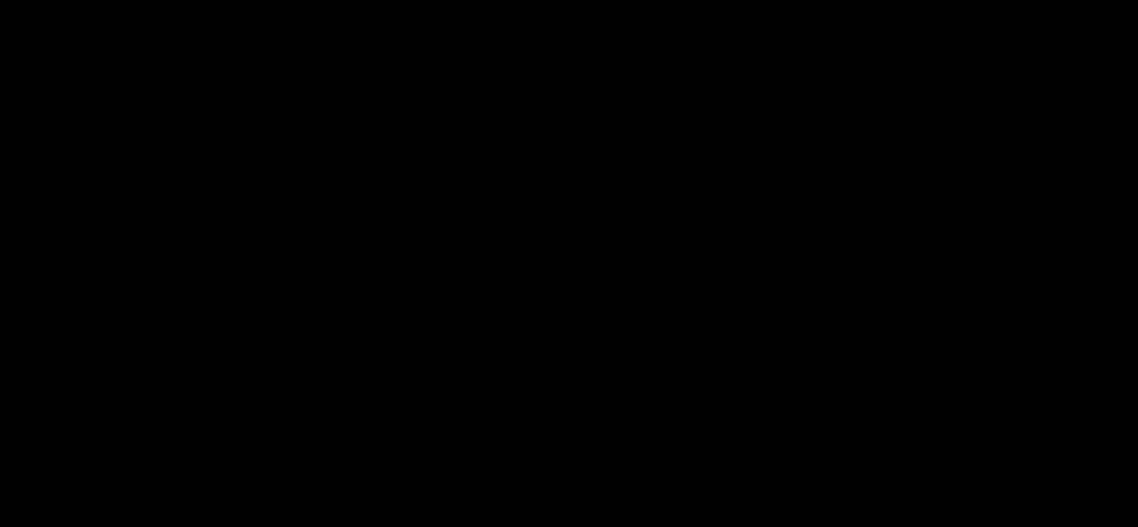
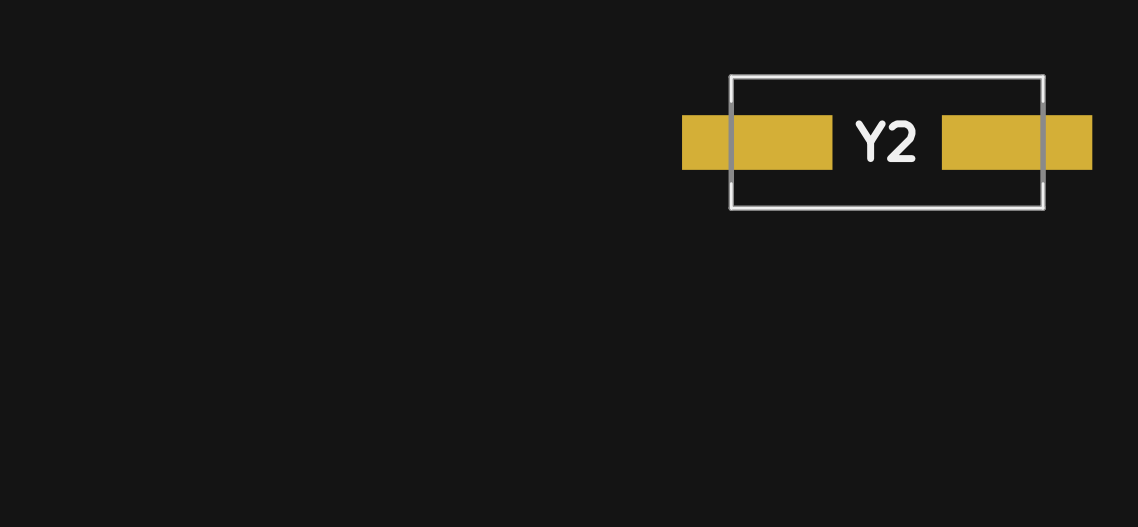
Y2: none -> (887, 142)

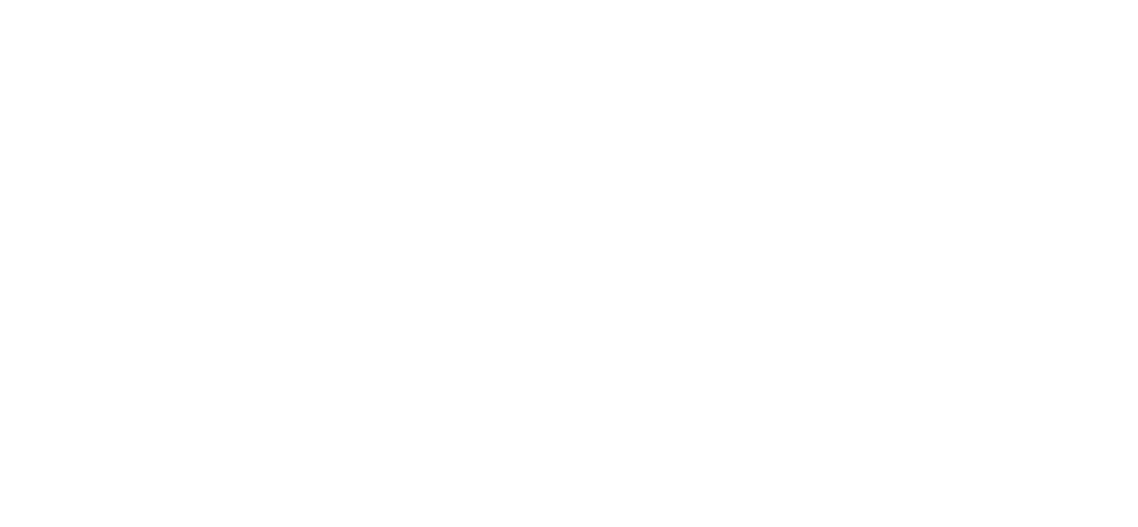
Y2: (887, 142) -> none

